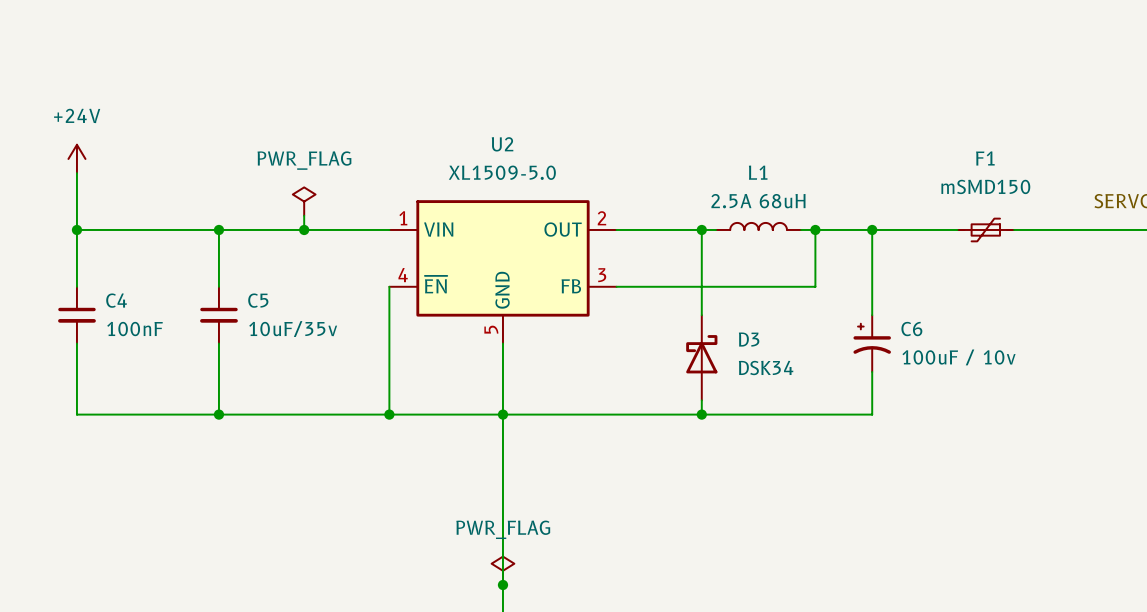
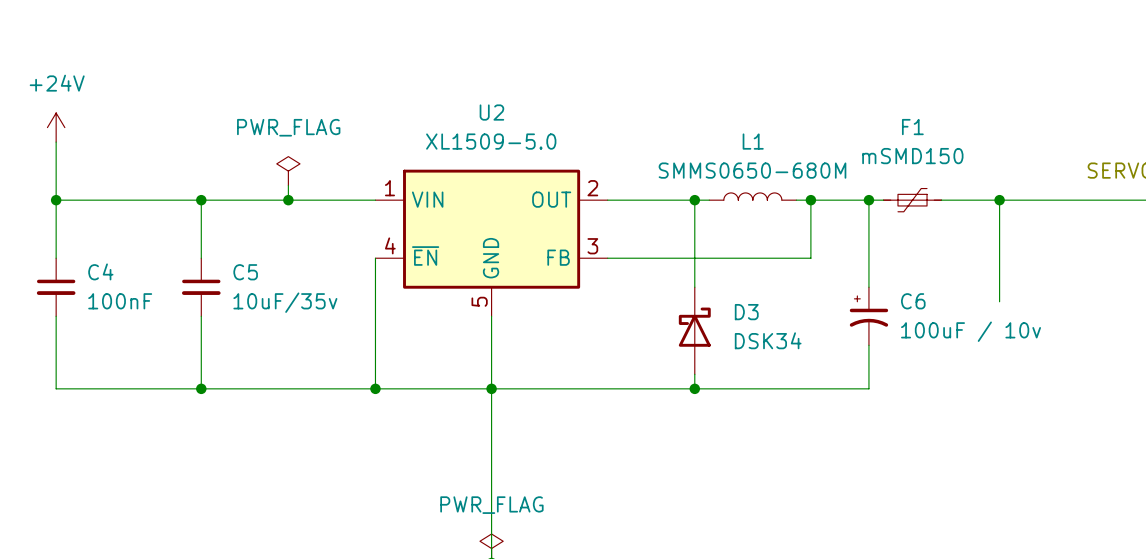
L1 value: 2.5A 68uH (758, 201) -> SMMS0650-680M (752, 170)
F1 position: (985, 229) -> (912, 200)
wire: none -> (999, 200) (999, 301)
junction: none -> (999, 200)

